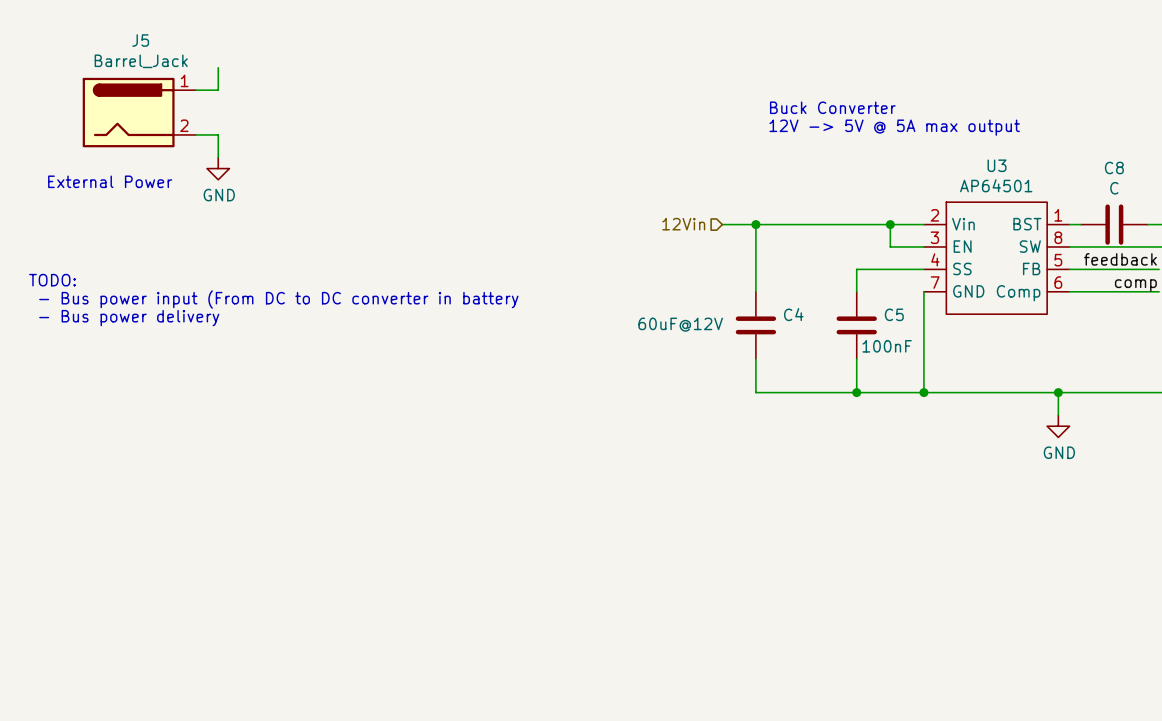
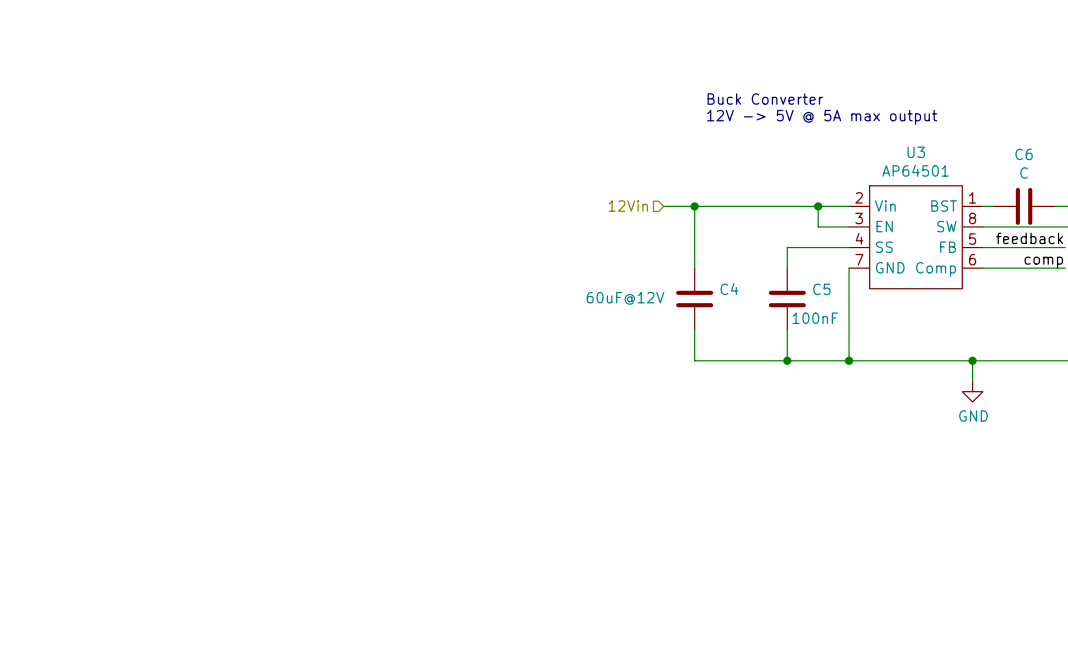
wire: (218, 67) (218, 90) (195, 90) -> none
J5: Barrel_Jack (139, 112) -> none
wire: (195, 134) (218, 134) (218, 157) -> none
C8 name: C8 (1114, 167) -> C6 (1024, 154)
power symbol: GND (218, 168) -> none
text: External Power (110, 181) -> none
text: TODO: (52, 280) -> none
text: - Bus power input (From DC to DC converter in battery (278, 299) -> none
text: - Bus power delivery (129, 318) -> none

